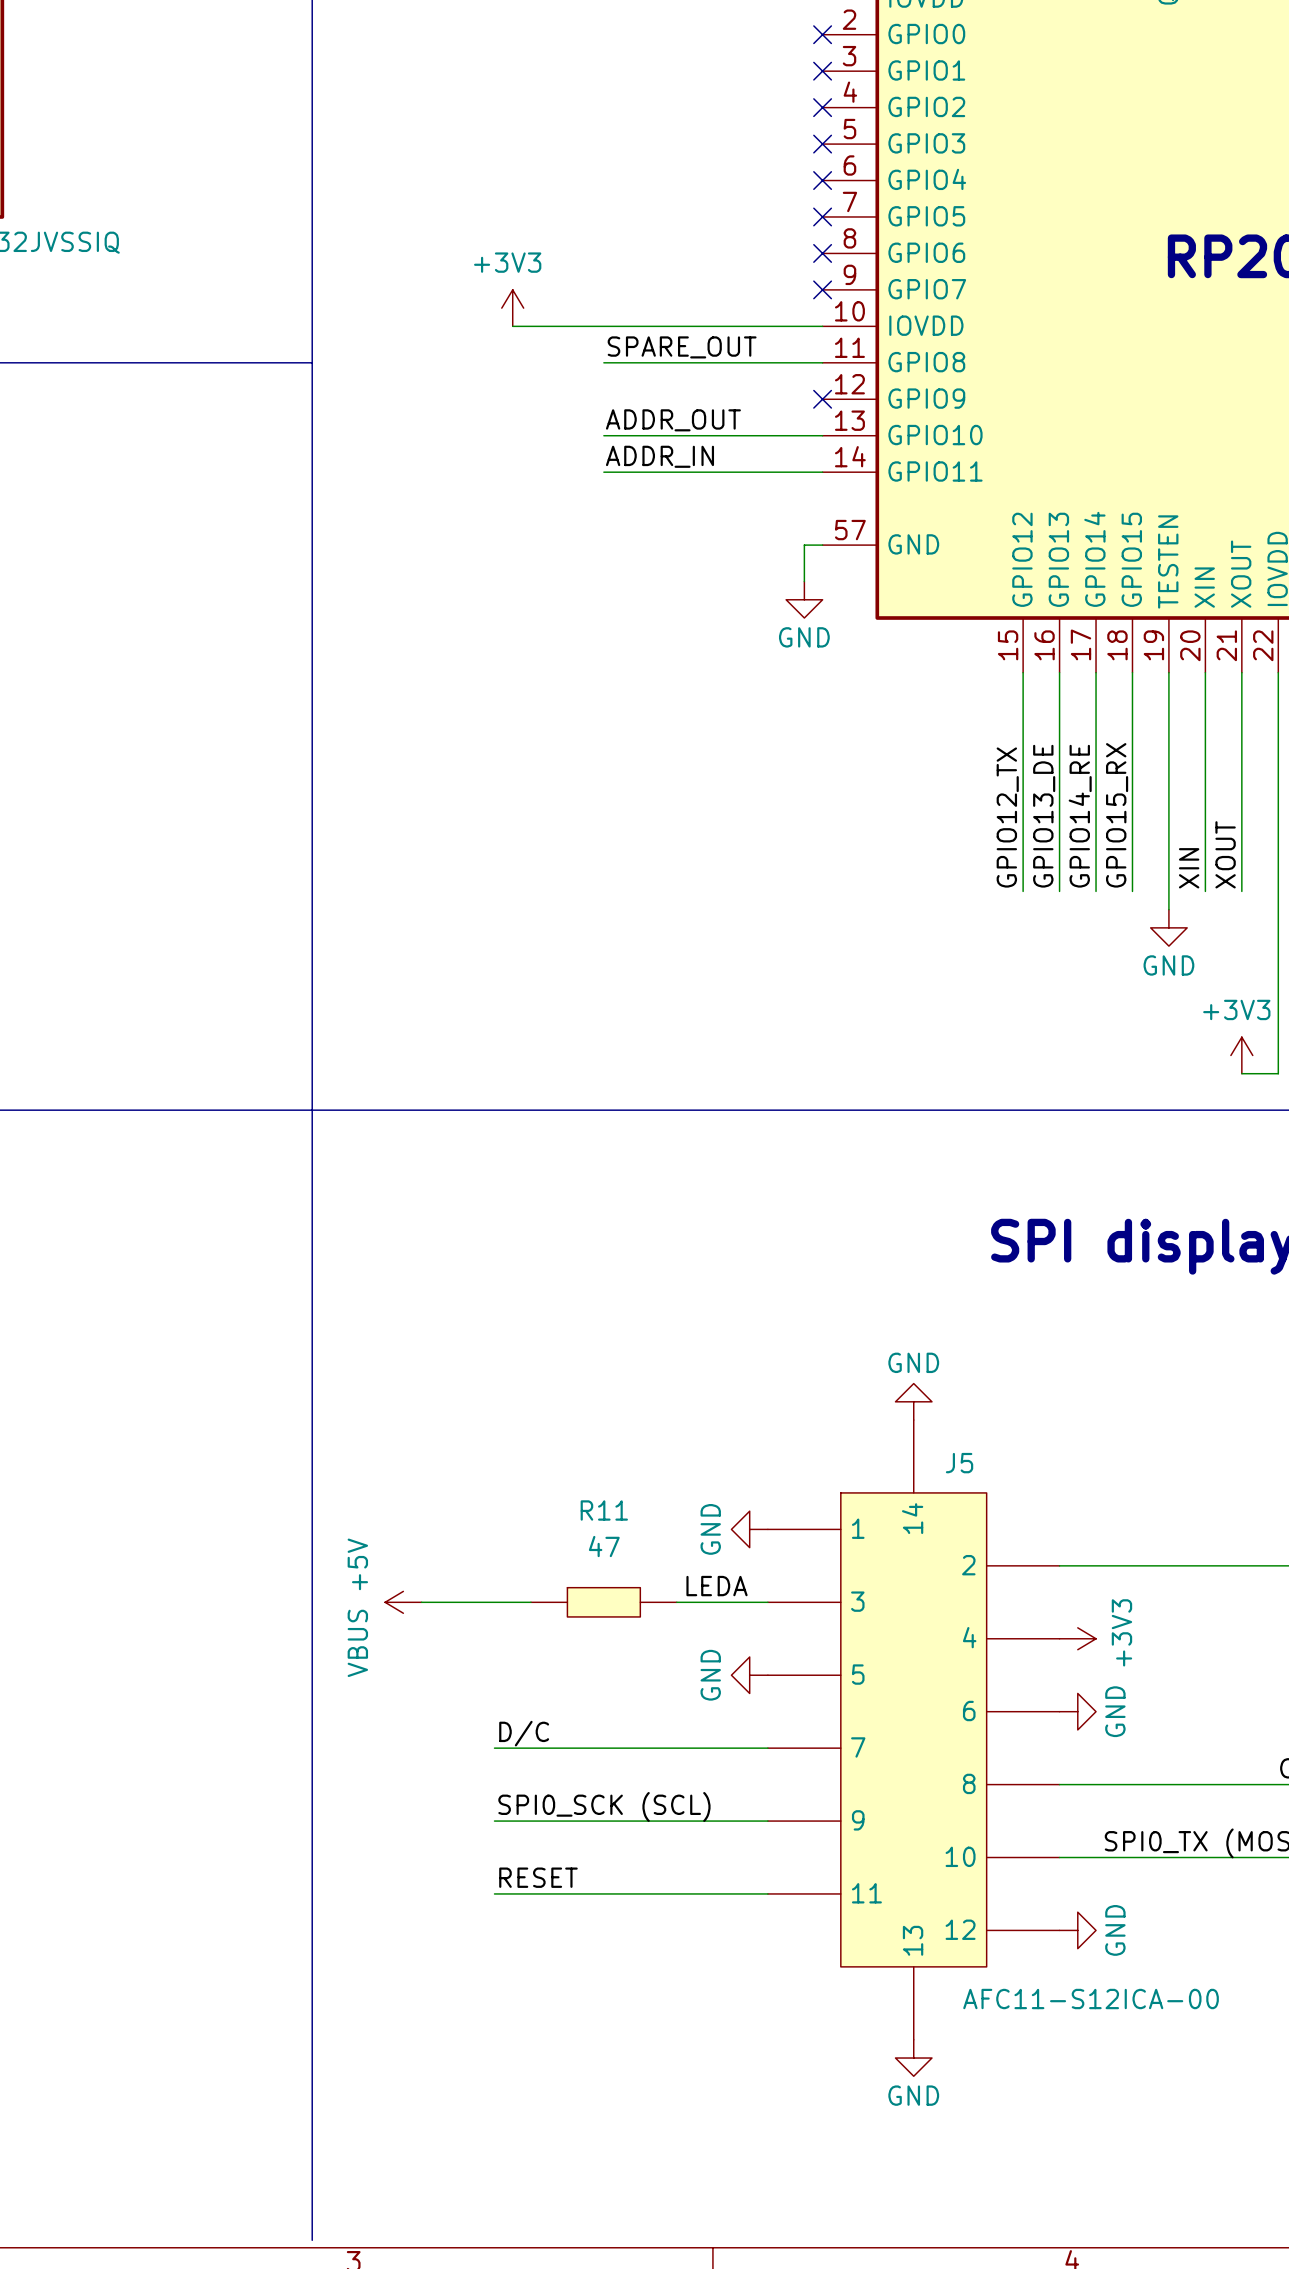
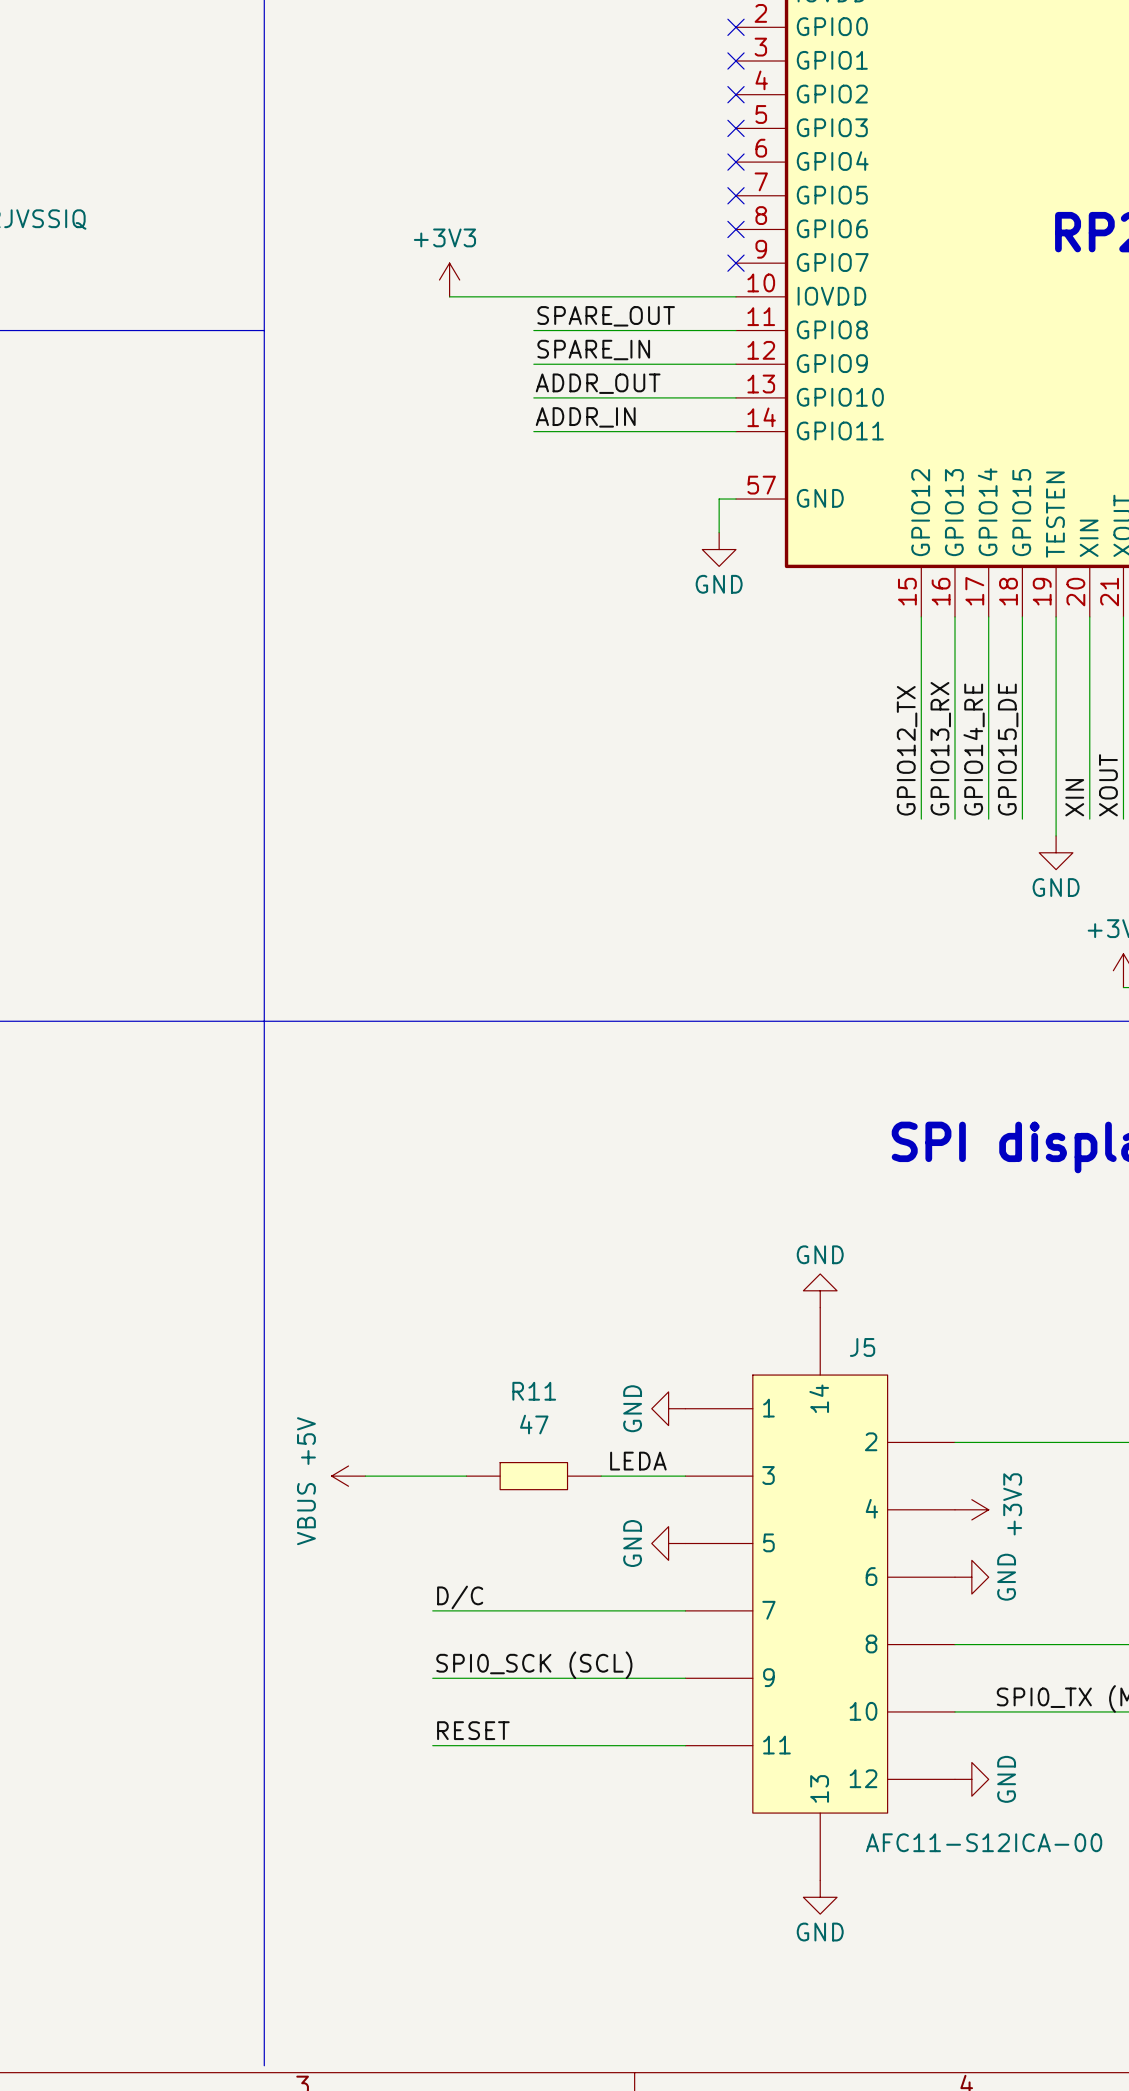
label: none -> SPARE_IN (593, 350)
wire: none -> (533, 364) (735, 364)
no-connect mark: (822, 399) -> none
label: GPIO15_RX (1117, 815) -> GPIO15_DE (1008, 749)
label: GPIO13_DE (1044, 816) -> GPIO13_RX (940, 748)

